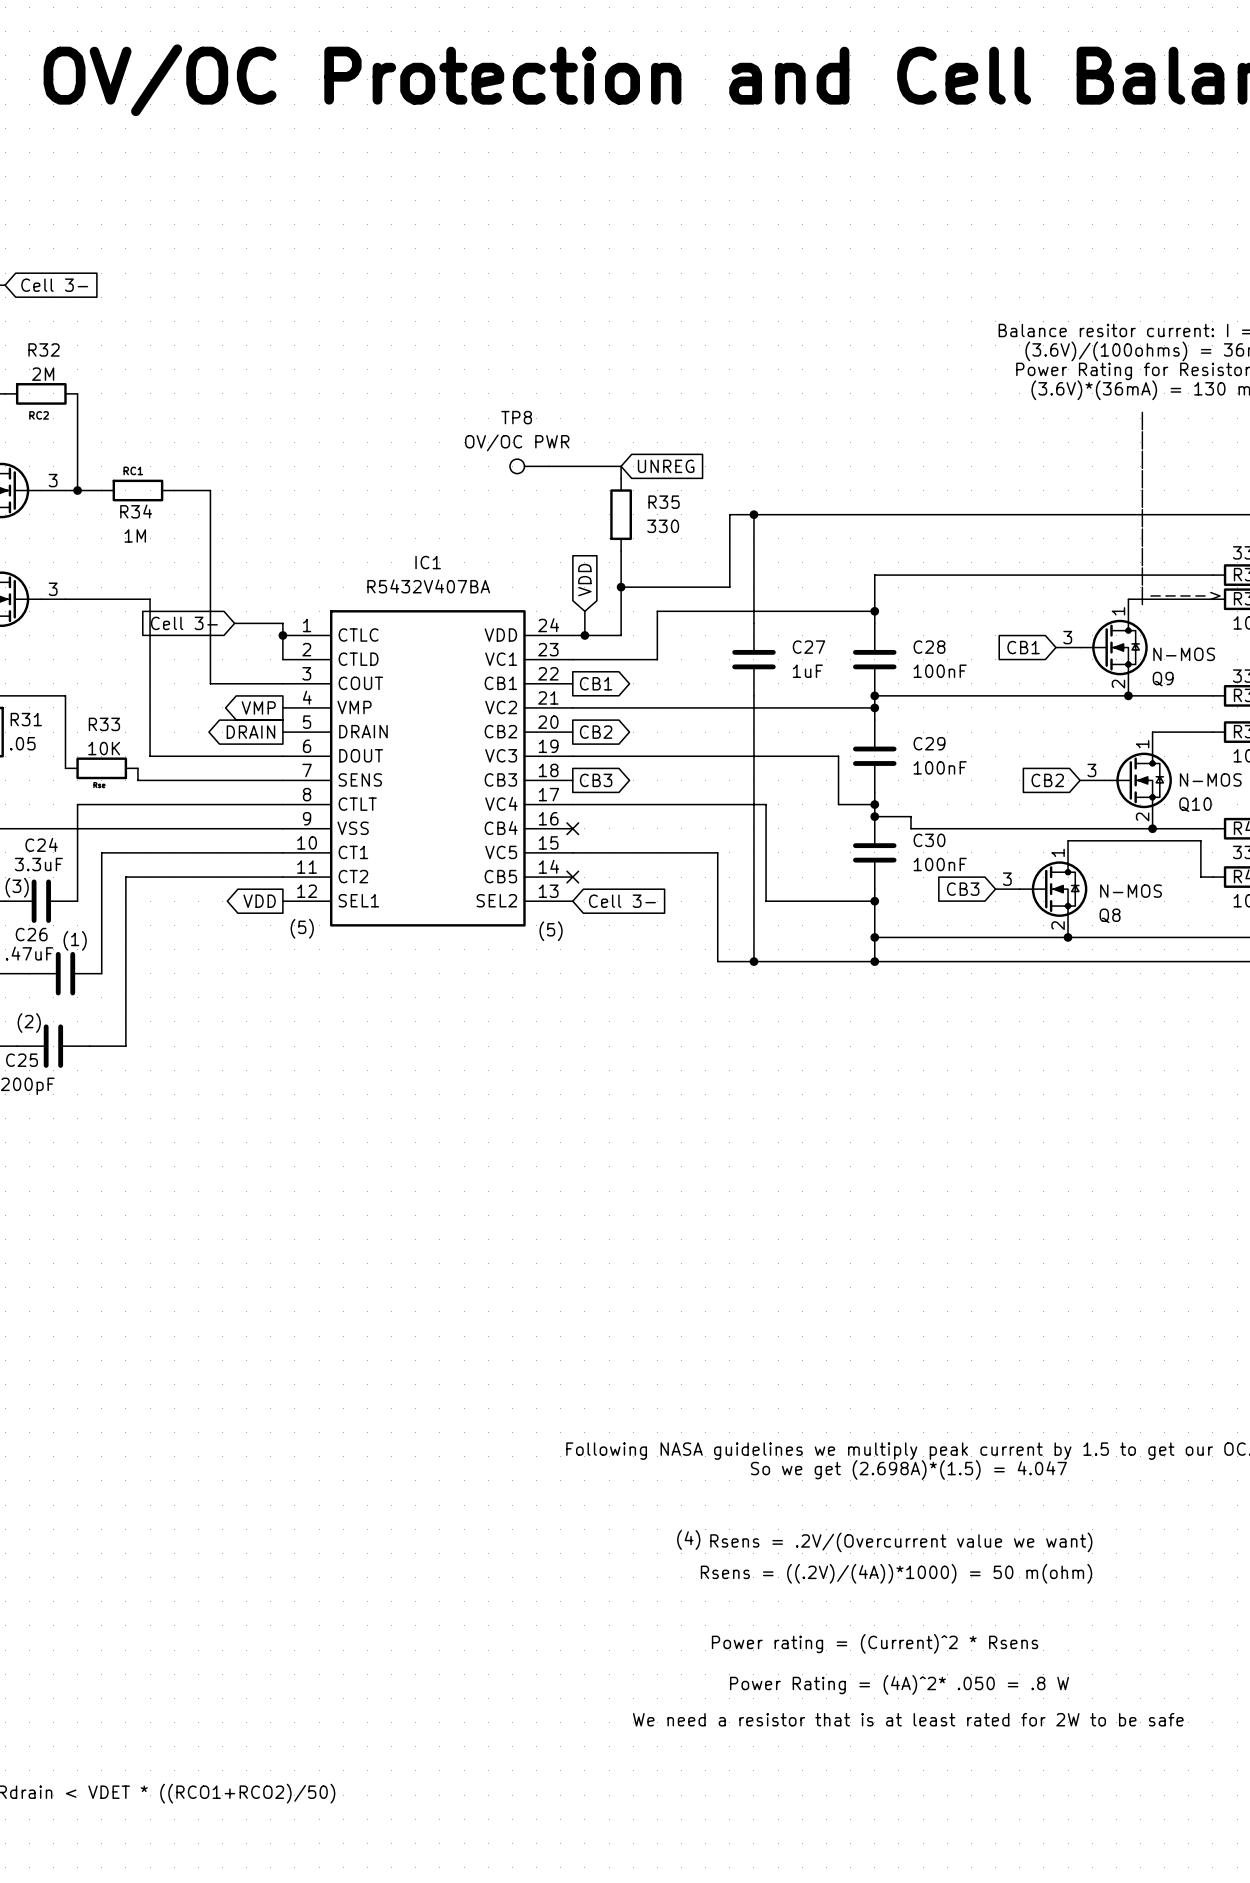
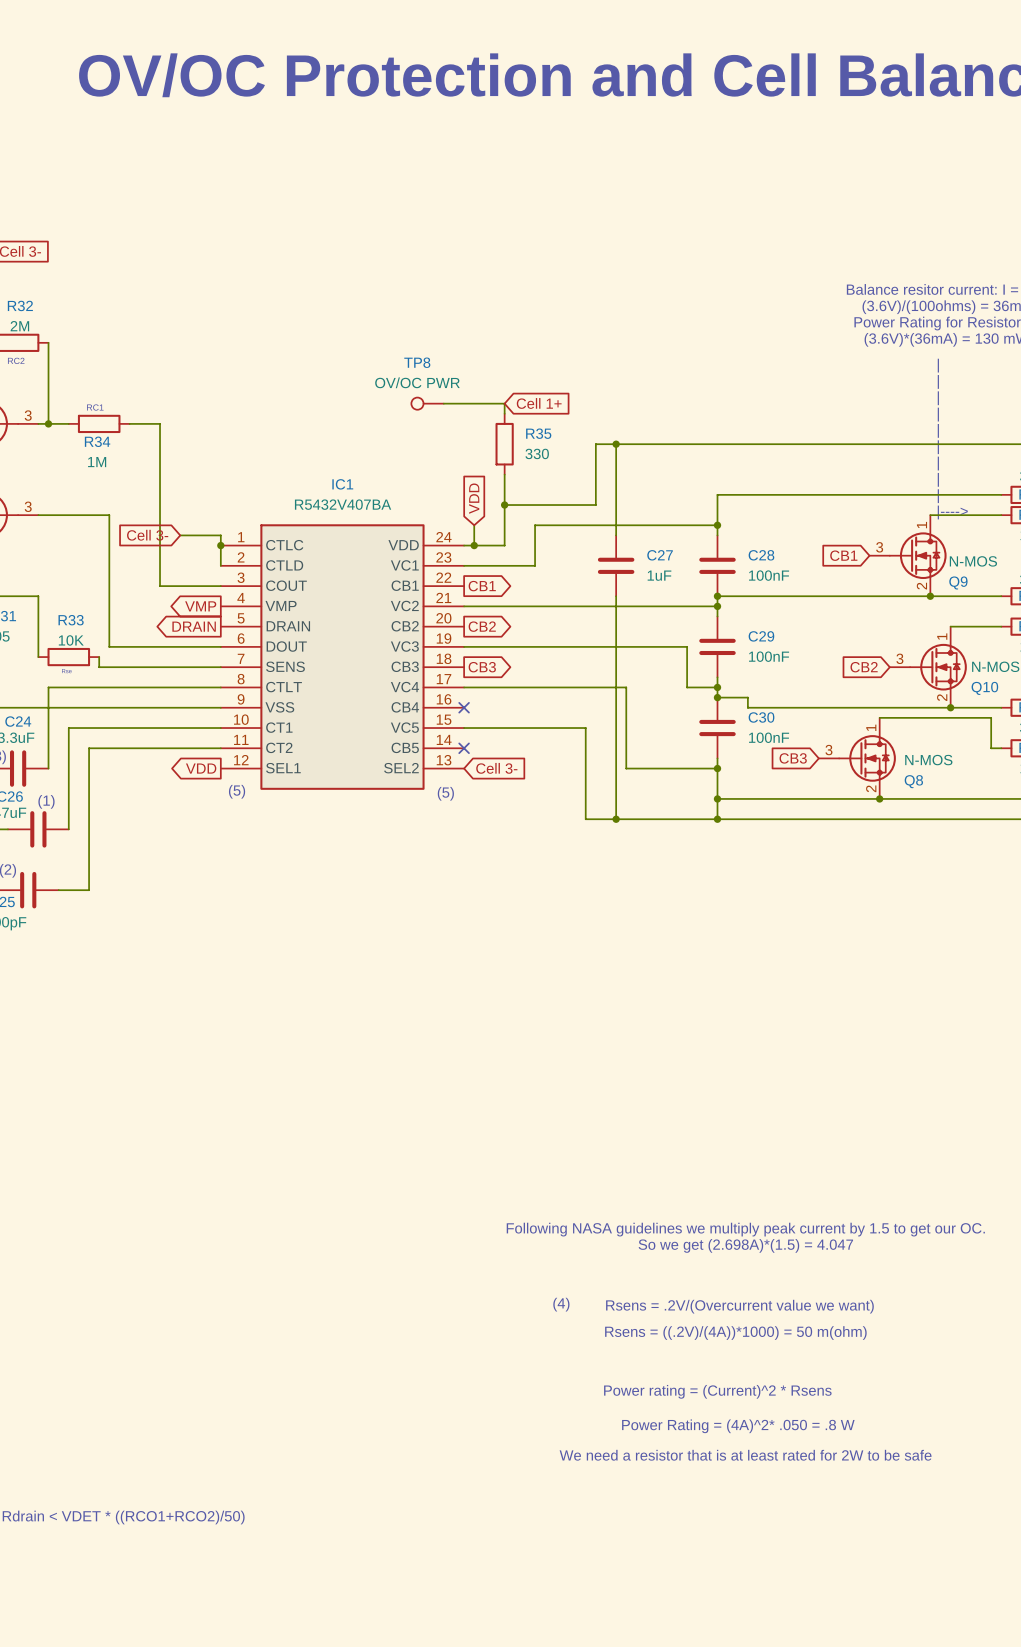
global label: UNREG (666, 466) -> Cell 1+ (539, 403)

